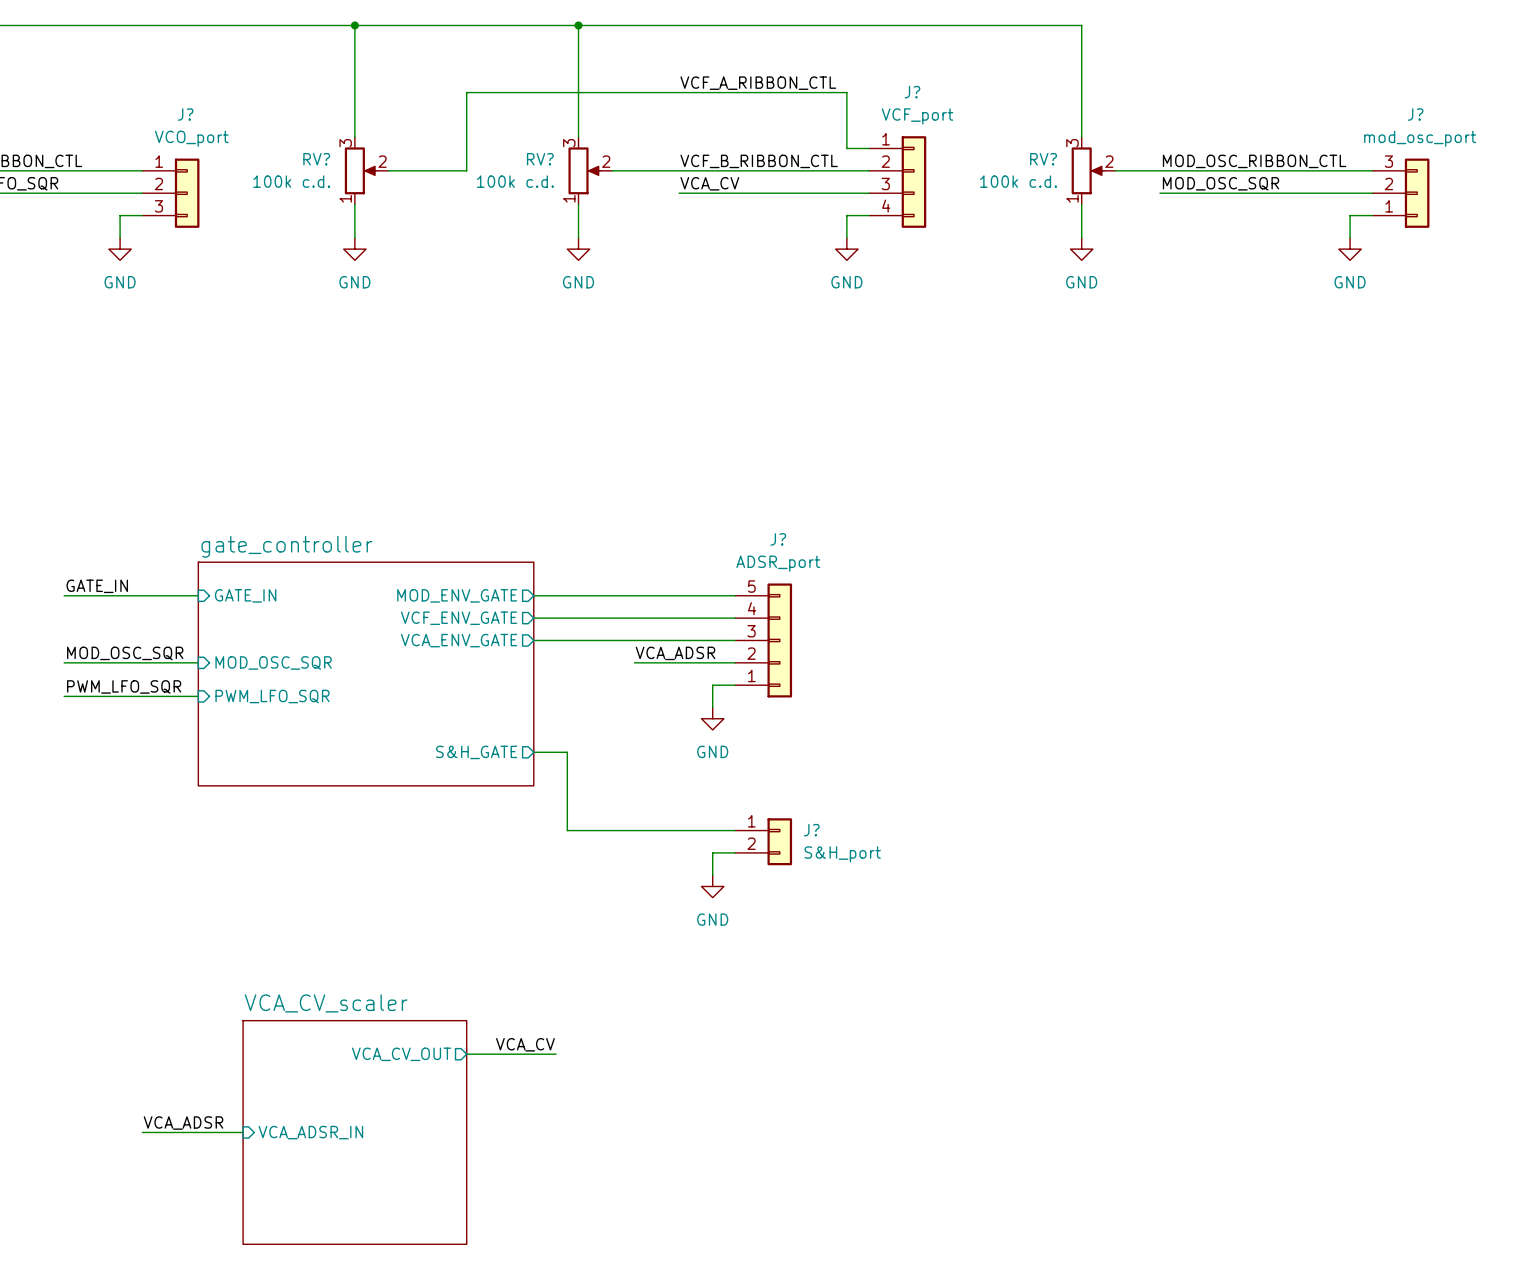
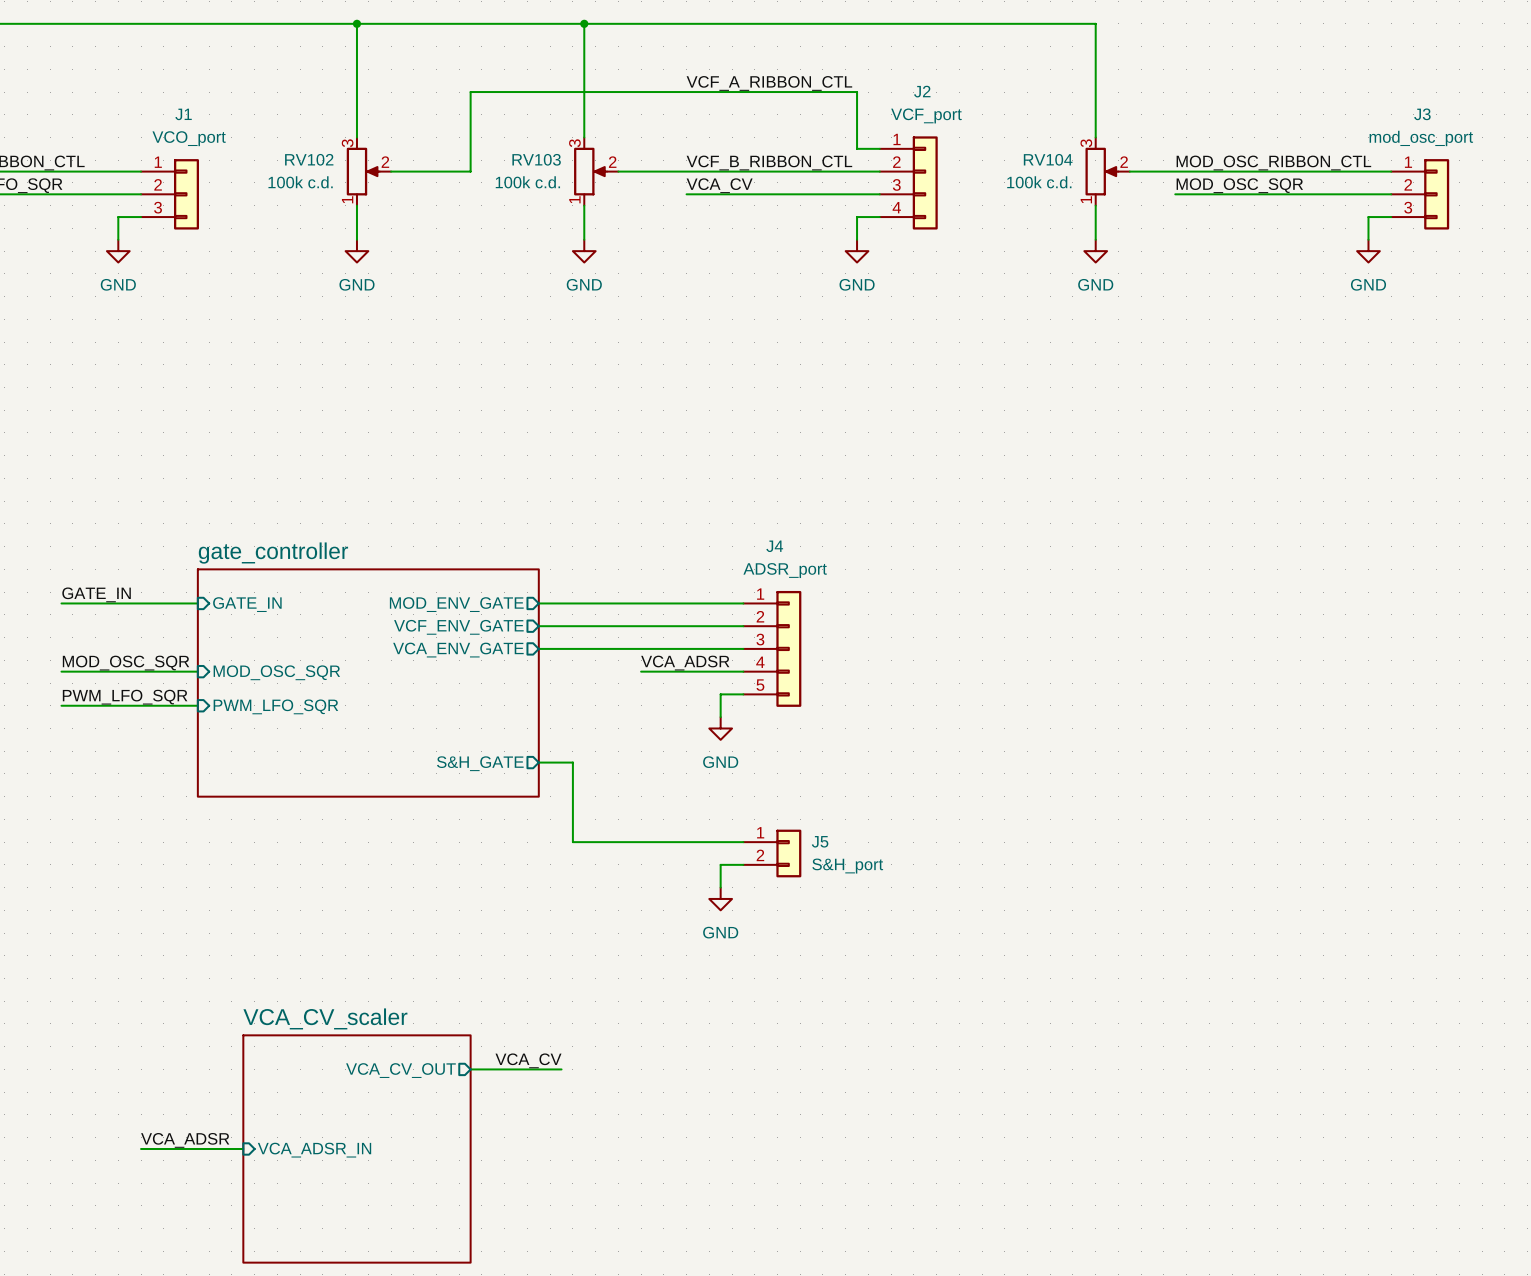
J? name: J? (912, 92) -> J2 (922, 91)
J? name: J? (185, 114) -> J1 (183, 114)
J? name: J? (1415, 114) -> J3 (1422, 114)
RV? name: RV? (316, 159) -> RV102 (309, 159)
RV? name: RV? (540, 159) -> RV103 (536, 159)
RV? name: RV? (1043, 159) -> RV104 (1048, 159)
J? flip: as is (1417, 193) -> up-down (1436, 194)
J? name: J? (778, 539) -> J4 (774, 546)
J? flip: as is (779, 640) -> up-down (788, 648)
J? name: J? (811, 830) -> J5 (820, 841)

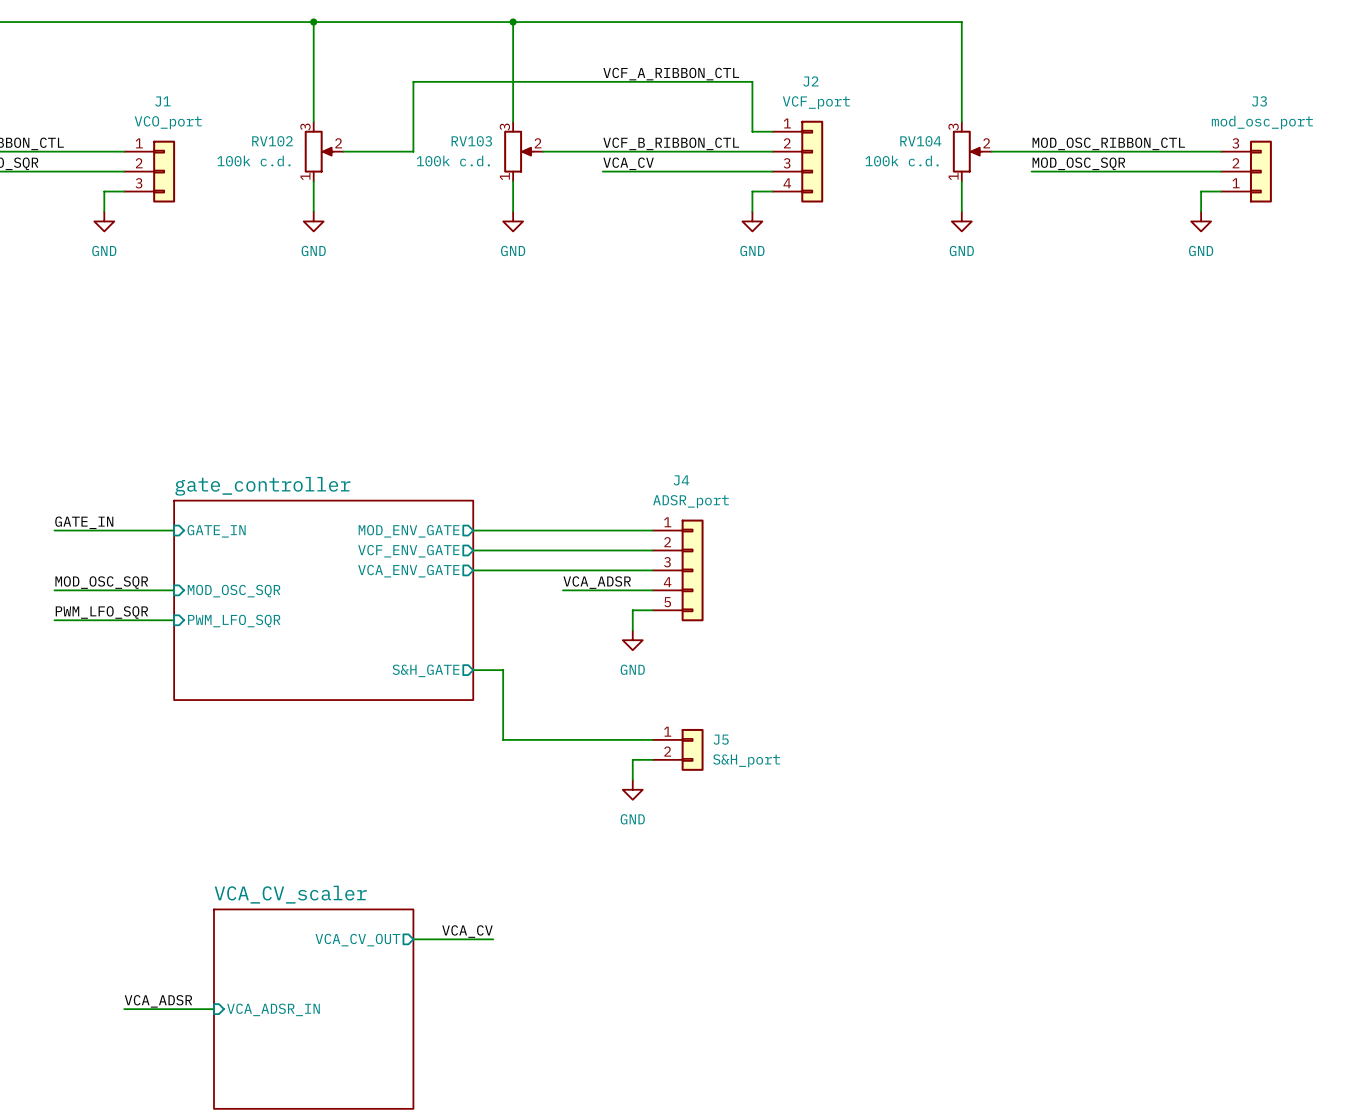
J3 flip: as is (1436, 194) -> up-down (1260, 171)

